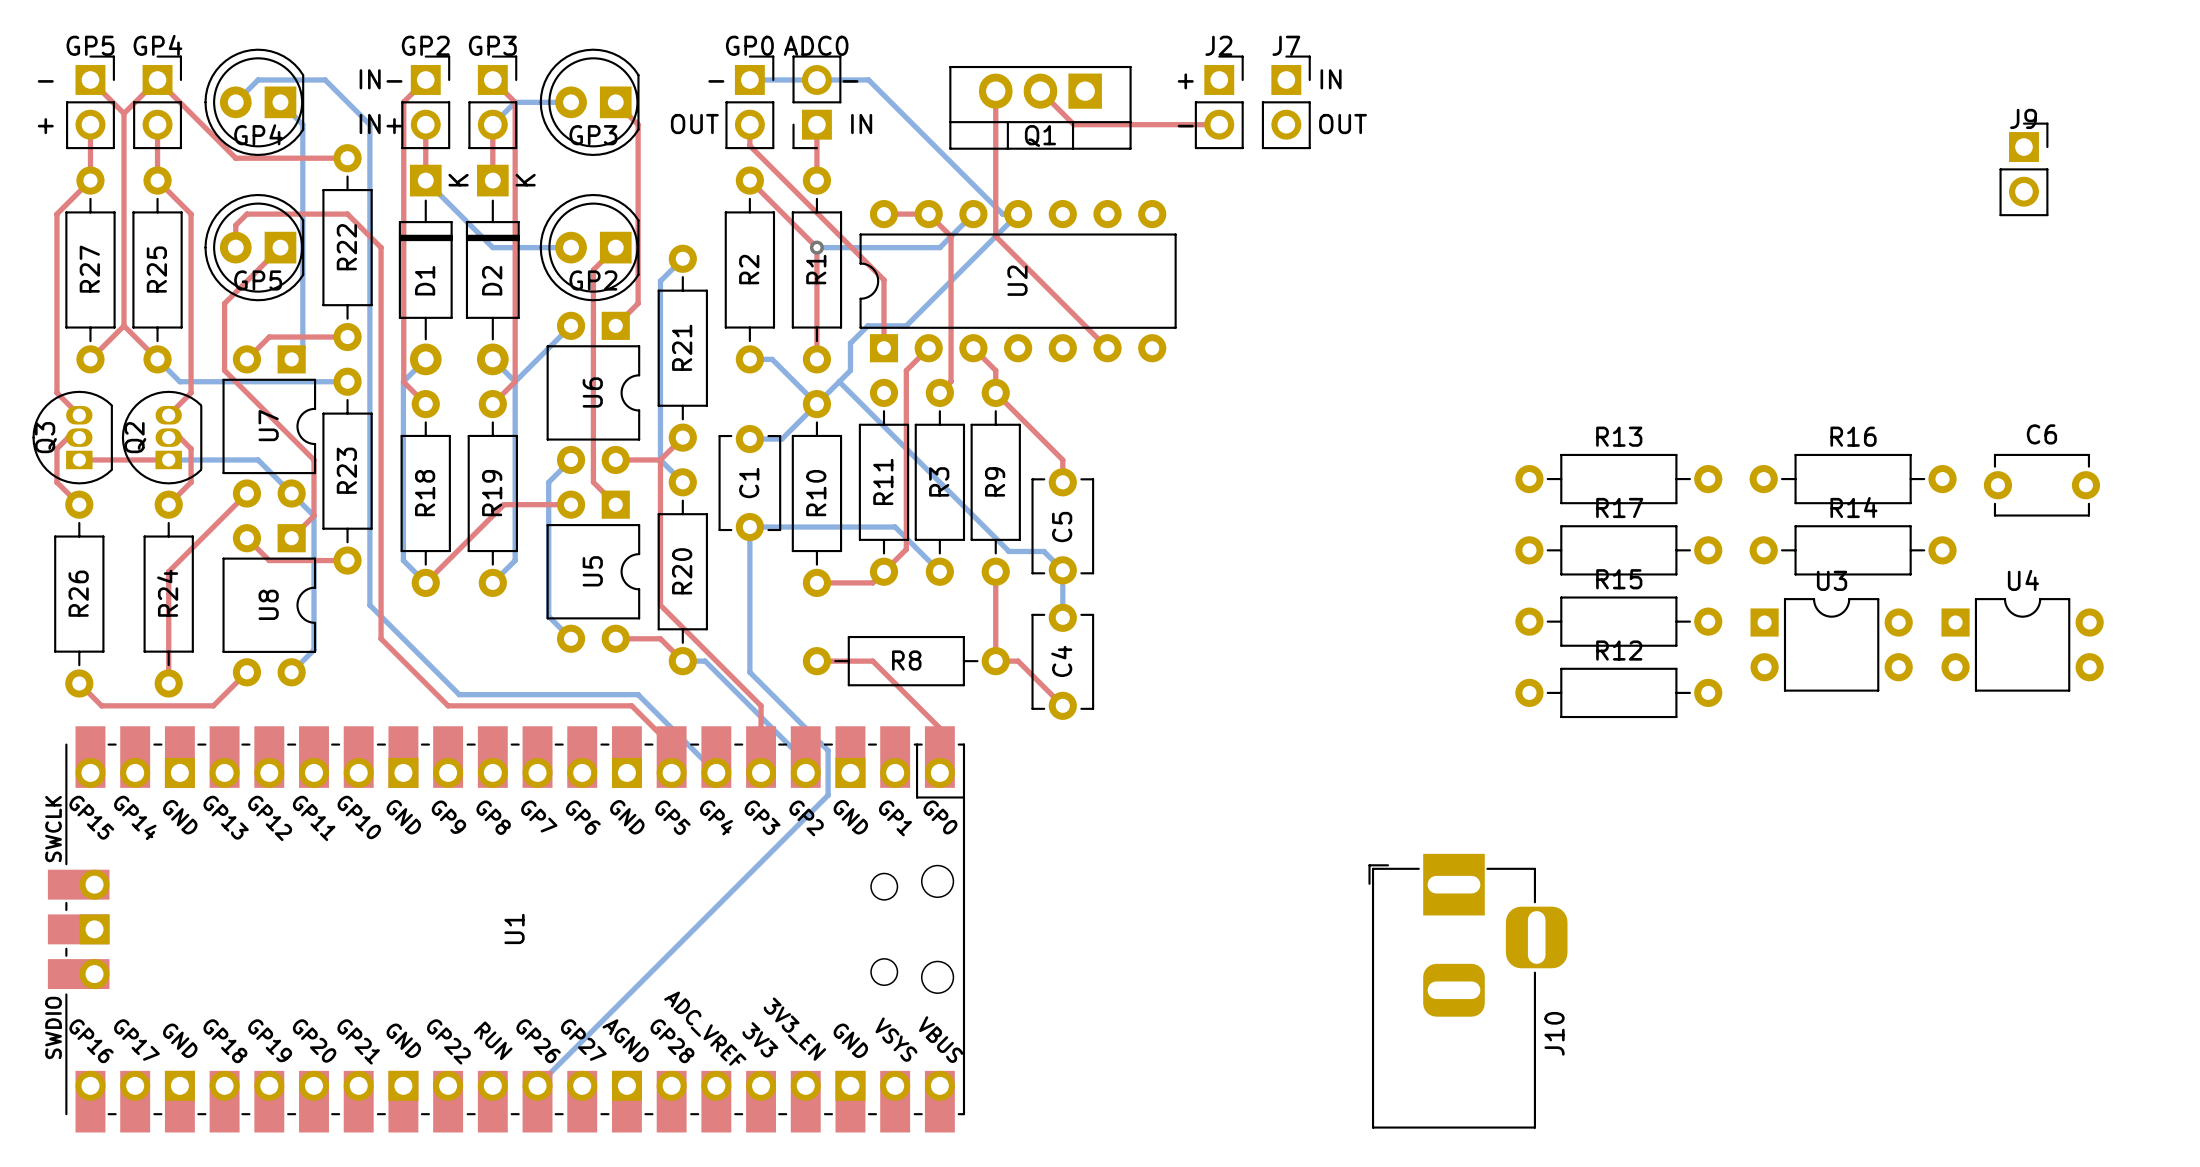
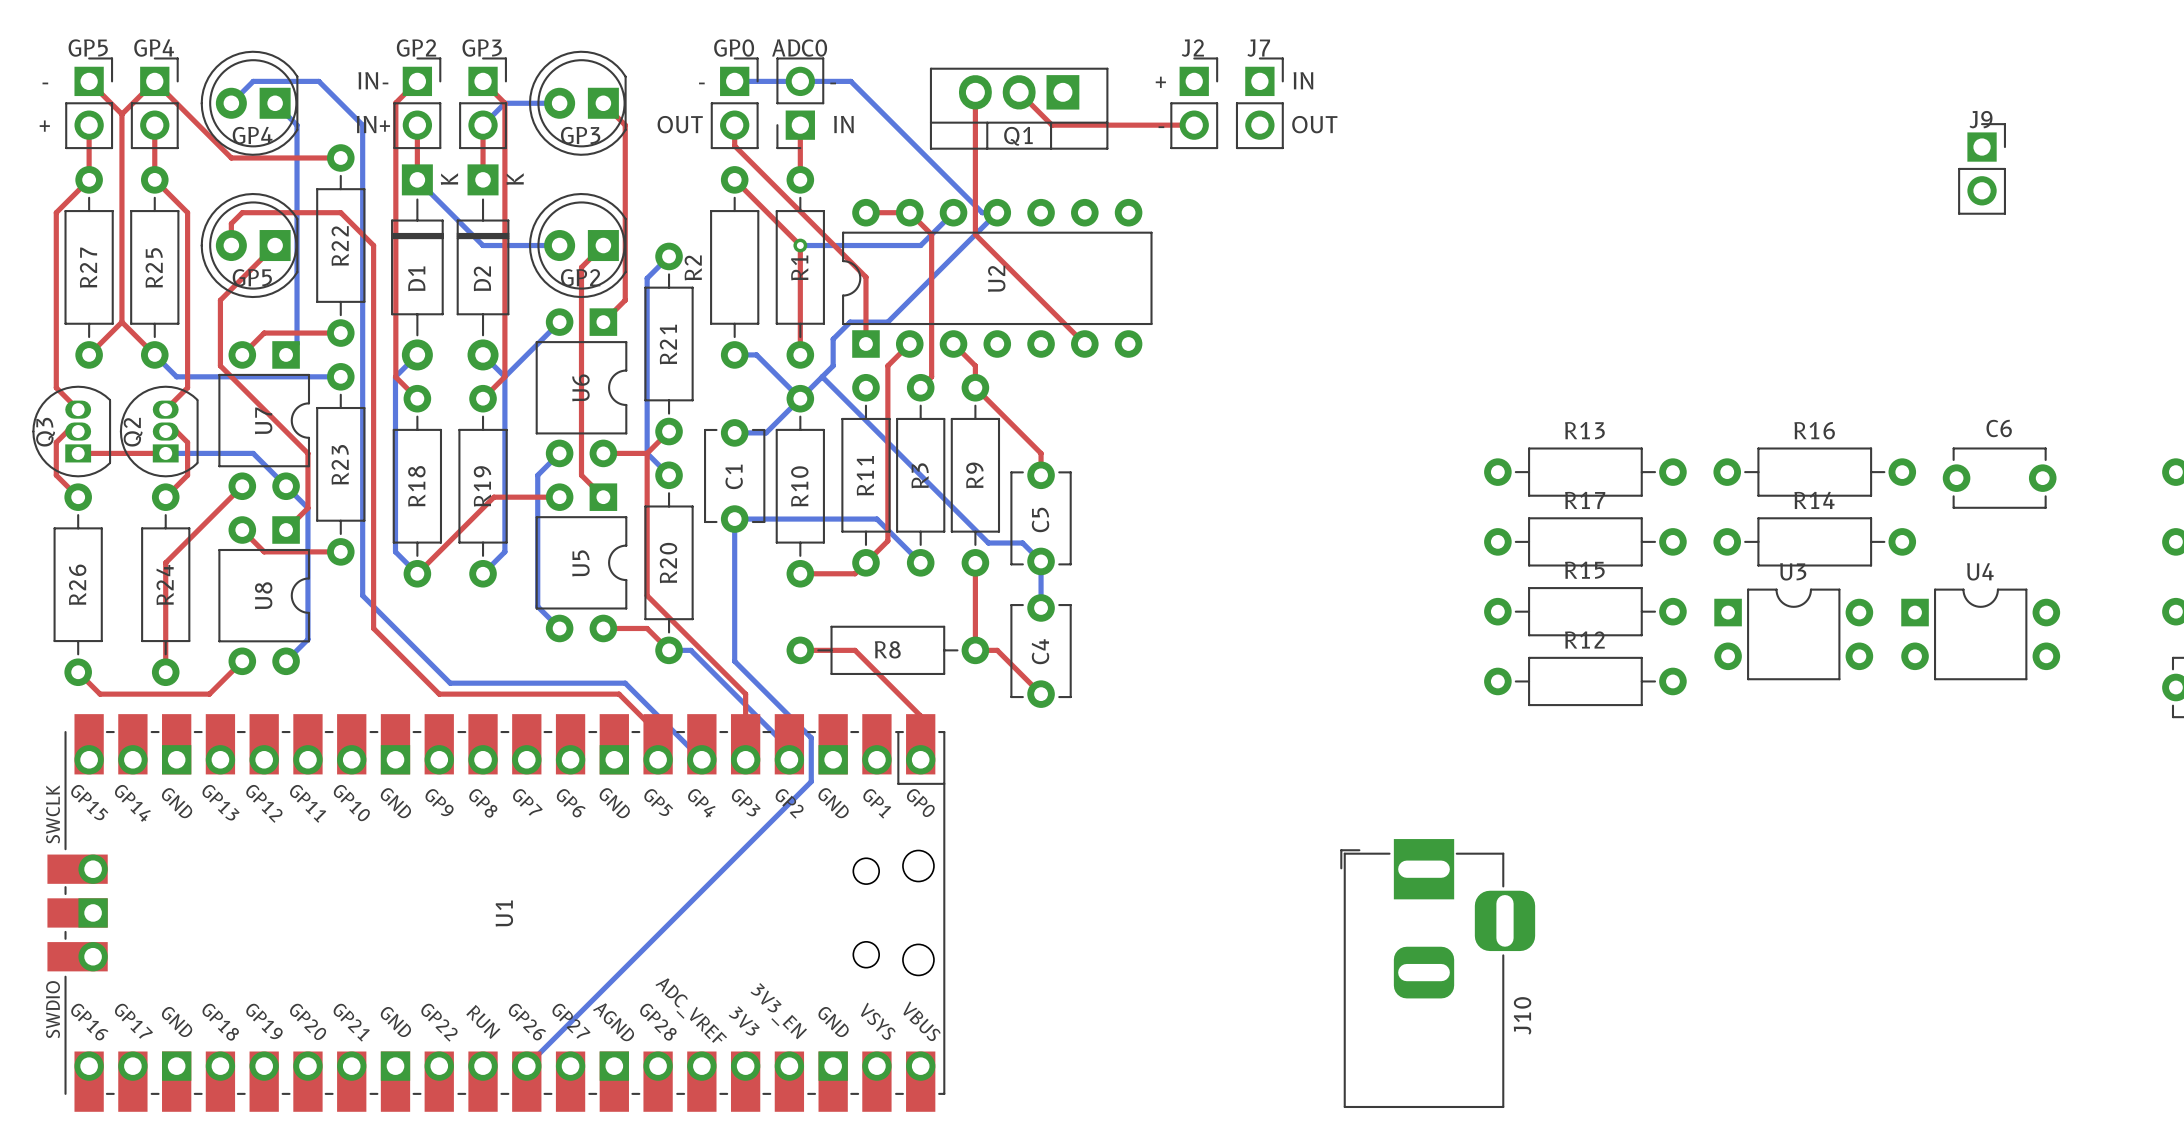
R2 name position: R2 (749, 269) -> R2 (693, 267)

